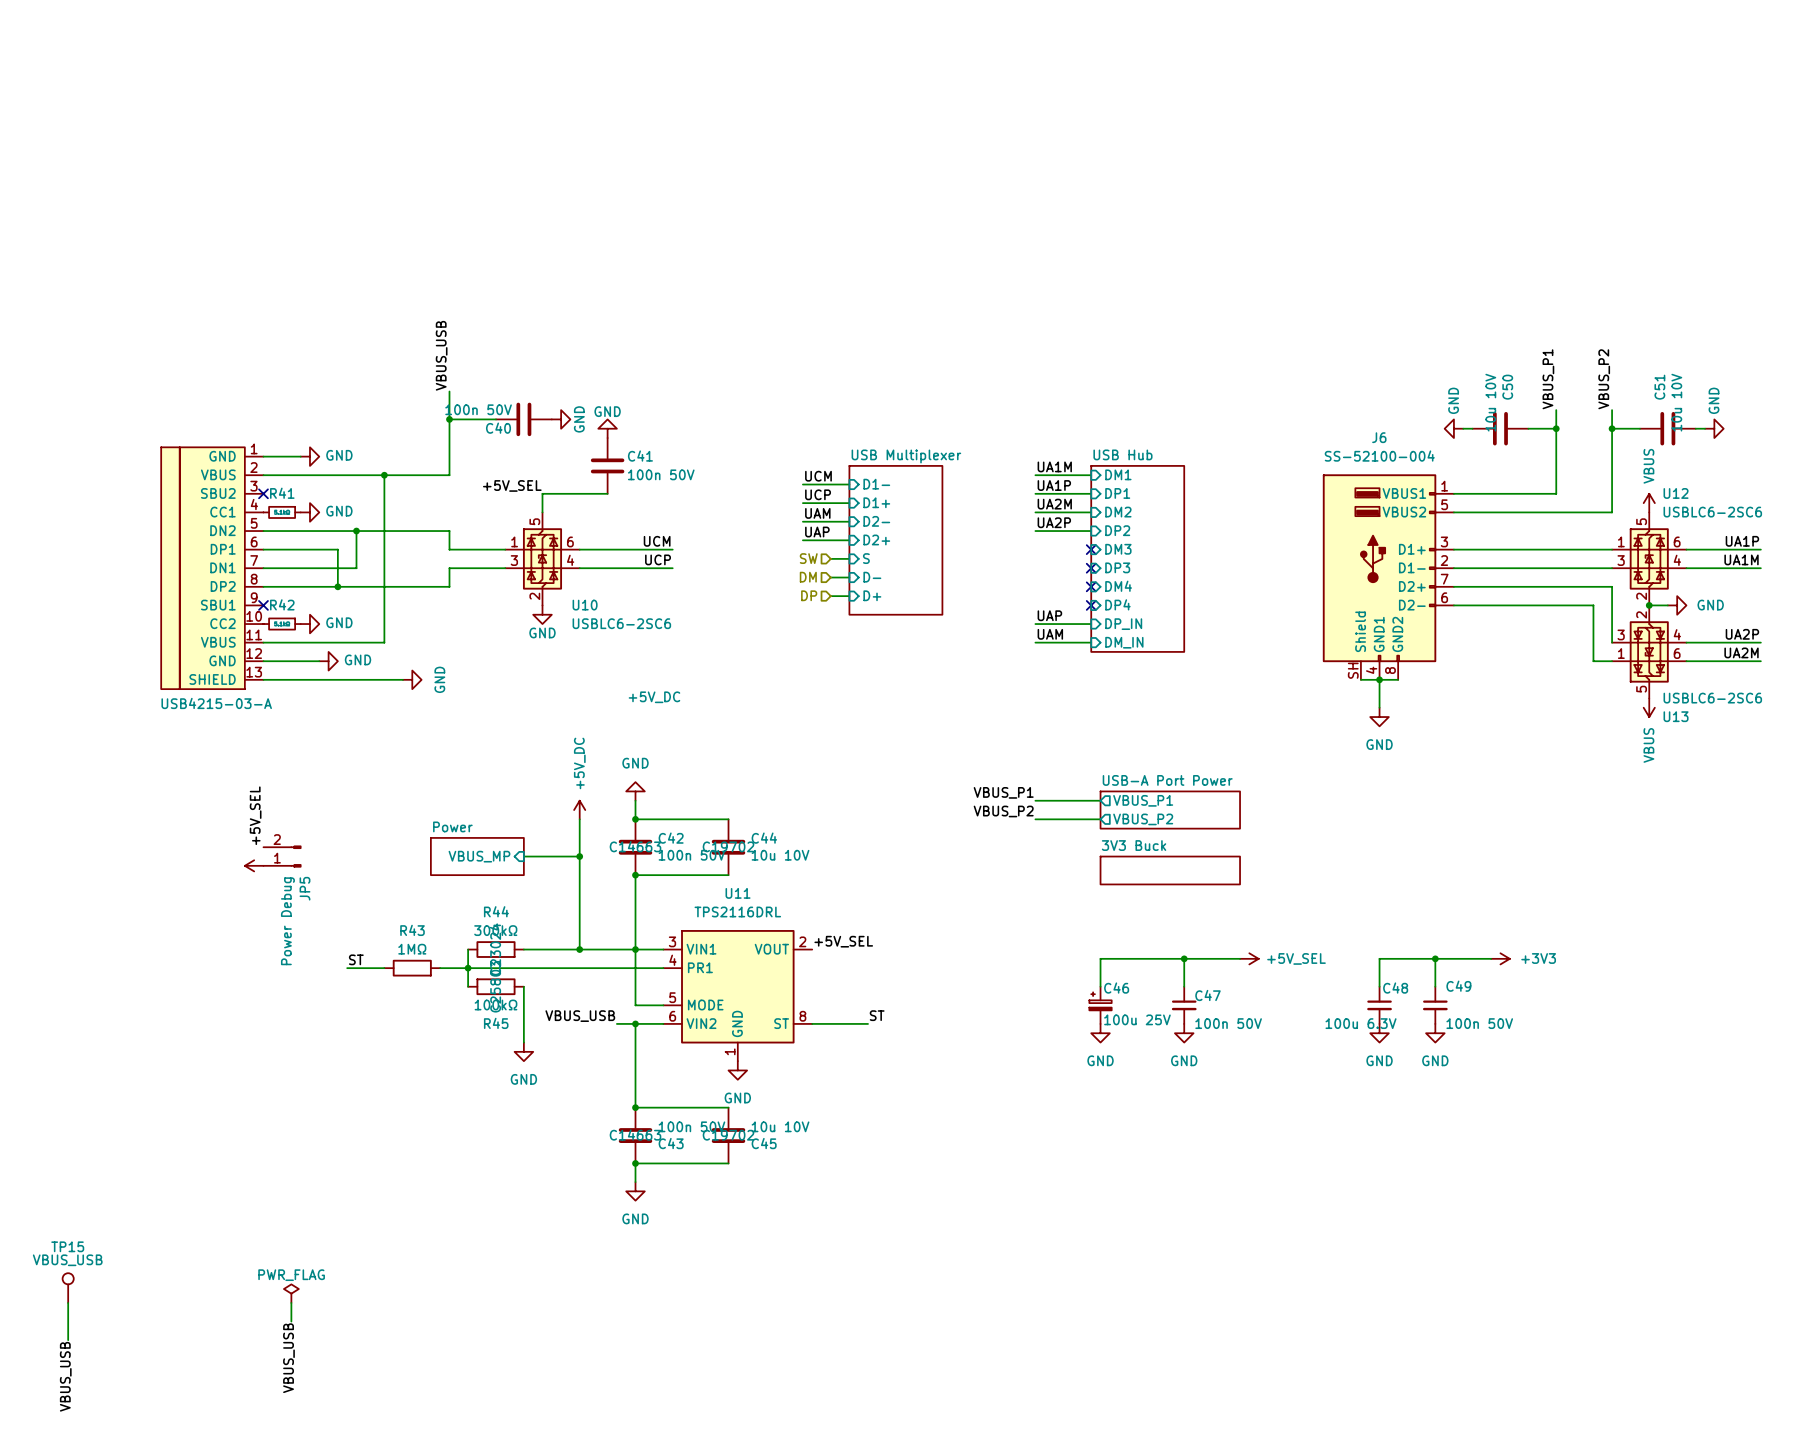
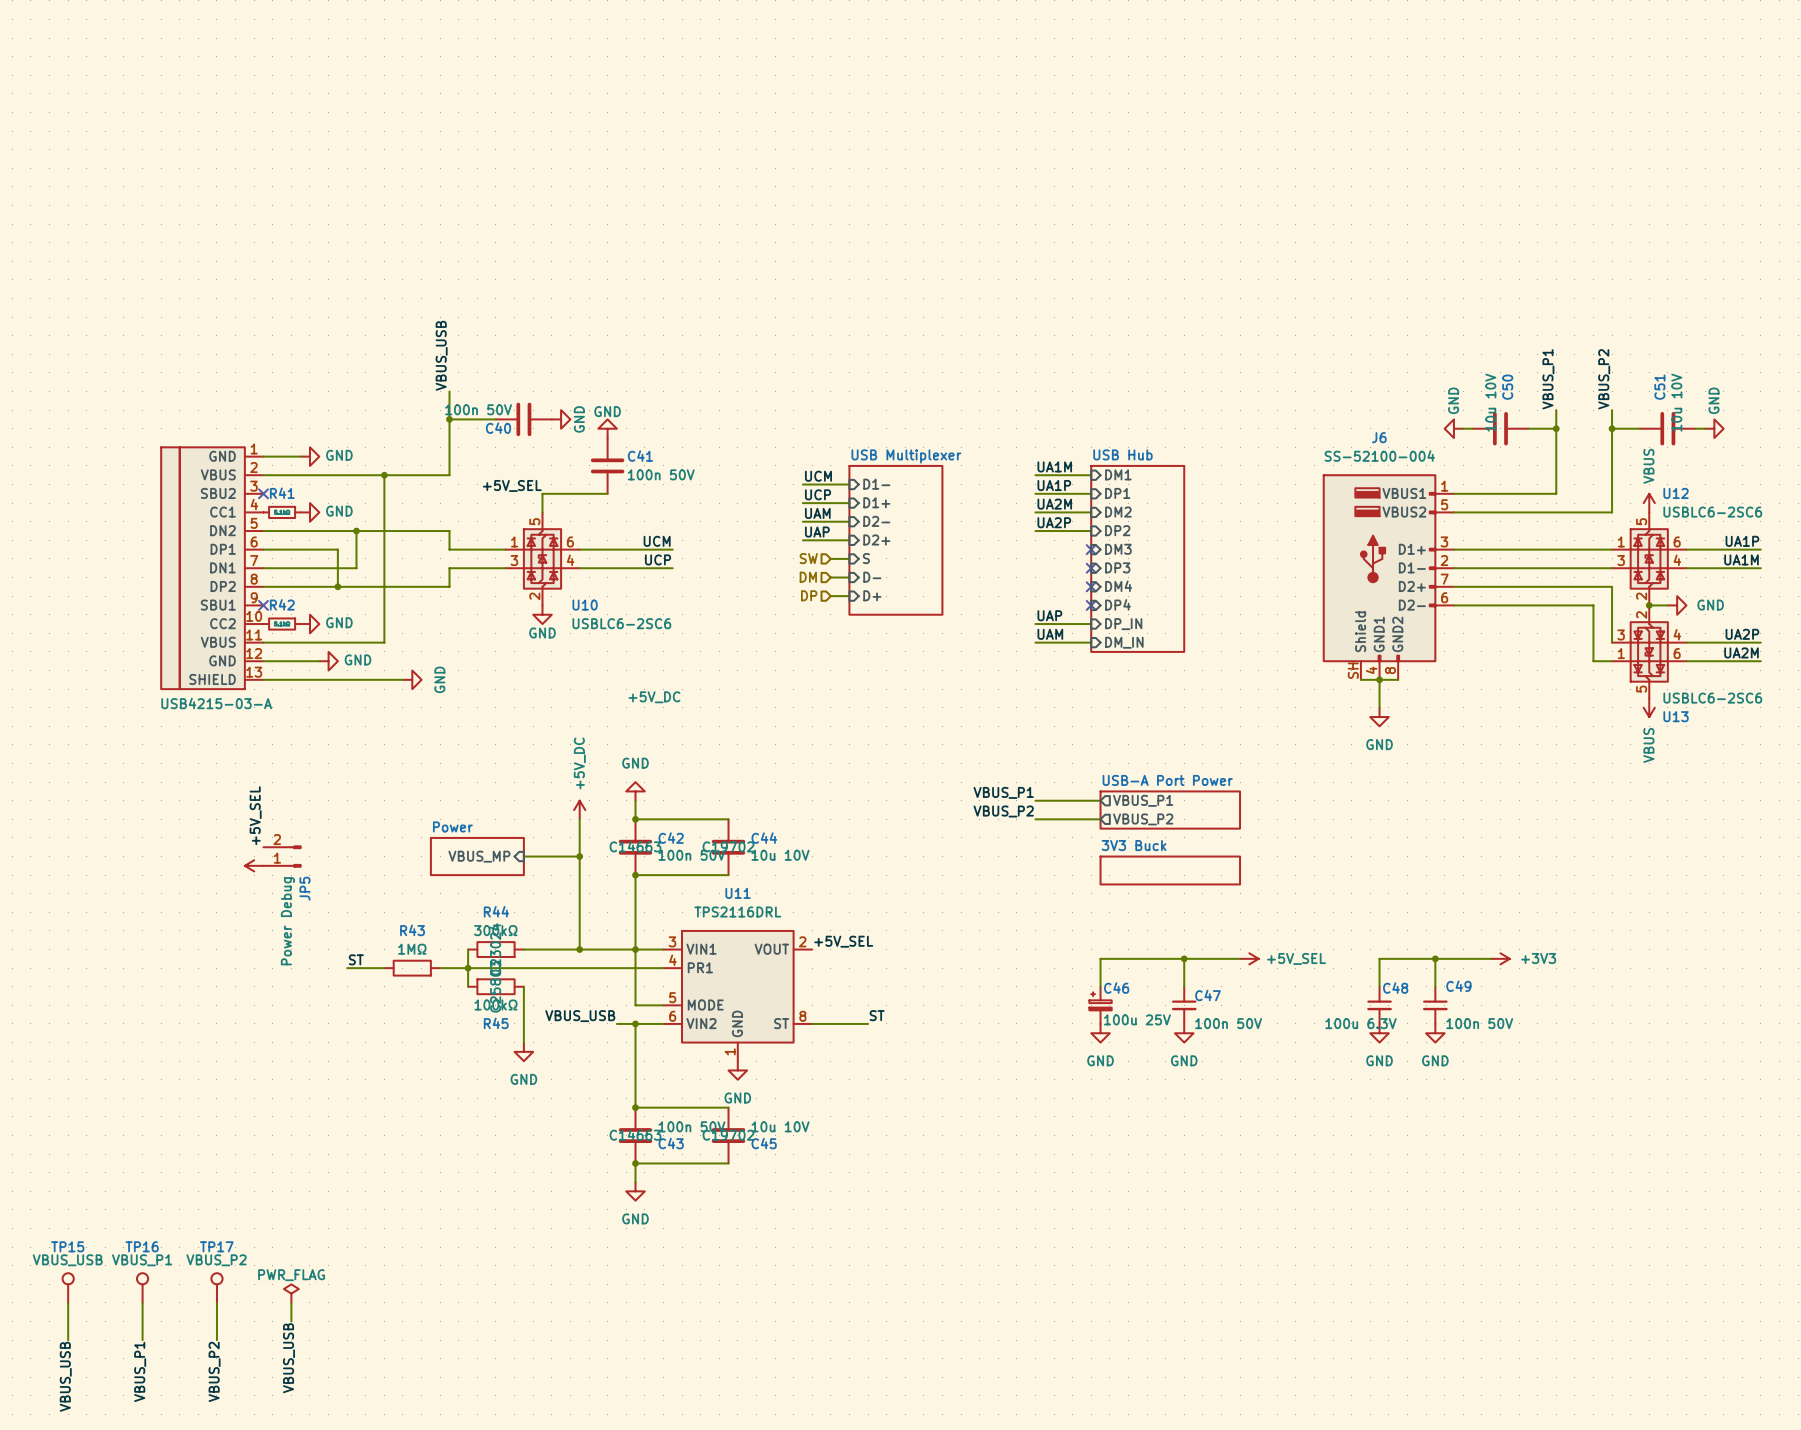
TP16: none -> VBUS_P1 (142, 1288)
TP17: none -> VBUS_P2 (216, 1288)
wire: none -> (142, 1302) (142, 1340)
wire: none -> (216, 1302) (216, 1340)
label: none -> VBUS_P1 (140, 1371)
label: none -> VBUS_P2 (214, 1371)

